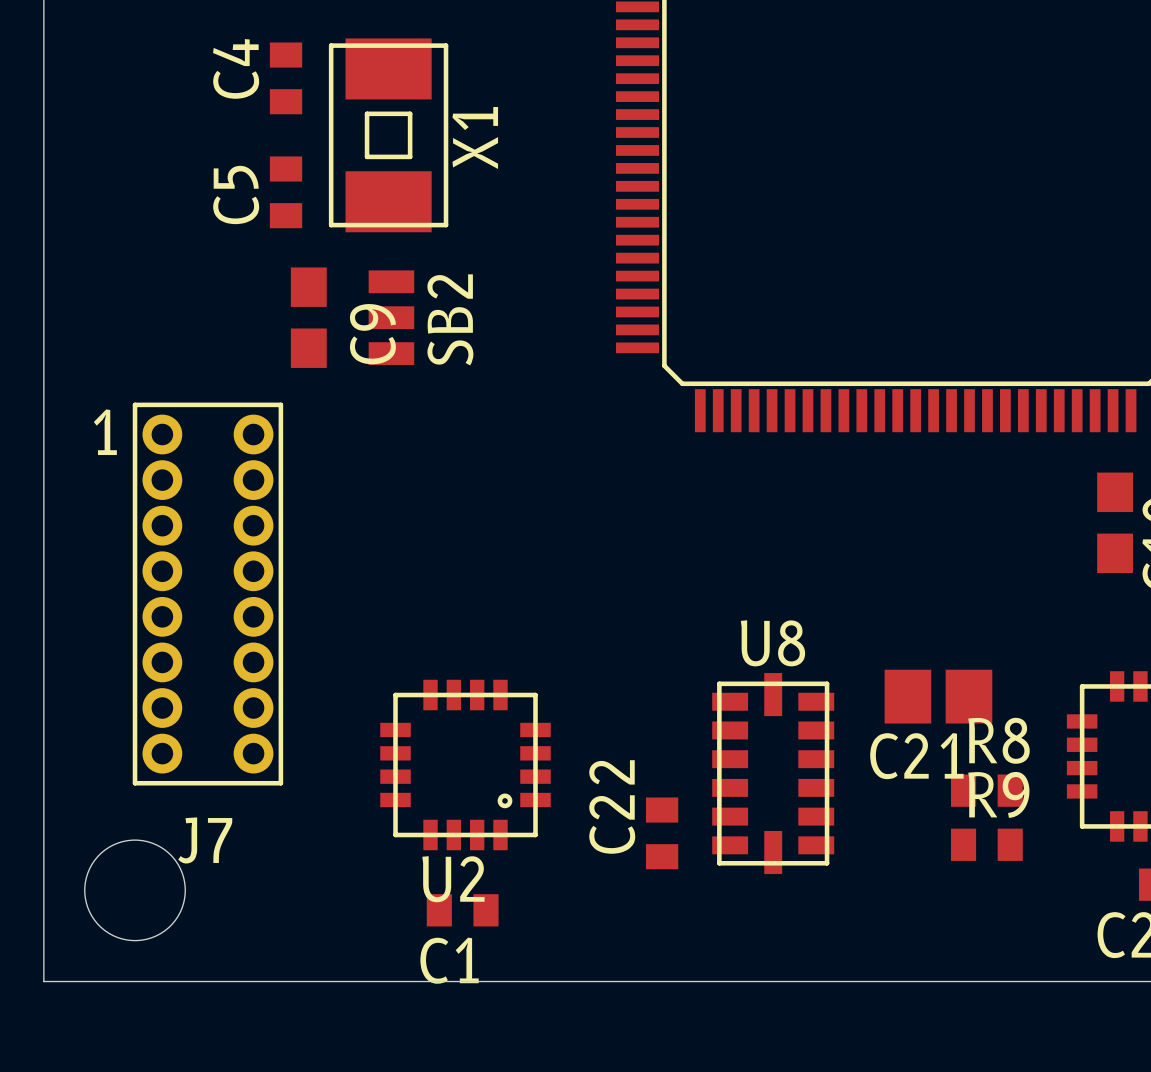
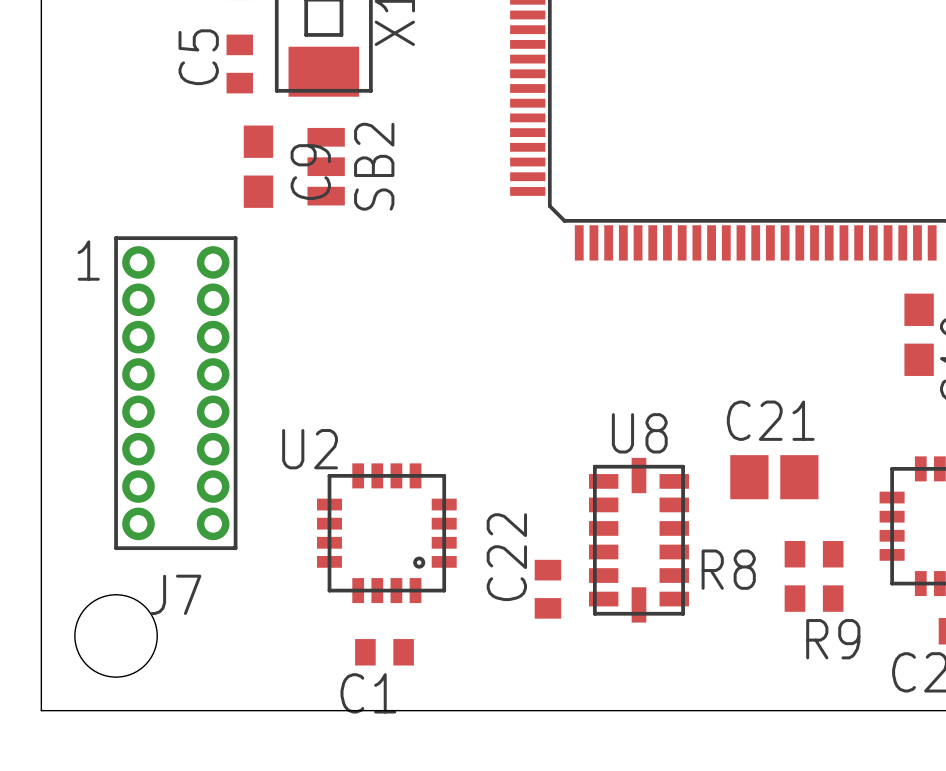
R8 name position: R8 (999, 740) -> R8 (728, 569)
C21 name position: C21 (916, 756) -> C21 (770, 420)
R9 name position: R9 (998, 794) -> R9 (833, 639)
U2 name position: U2 (453, 879) -> U2 (310, 449)

